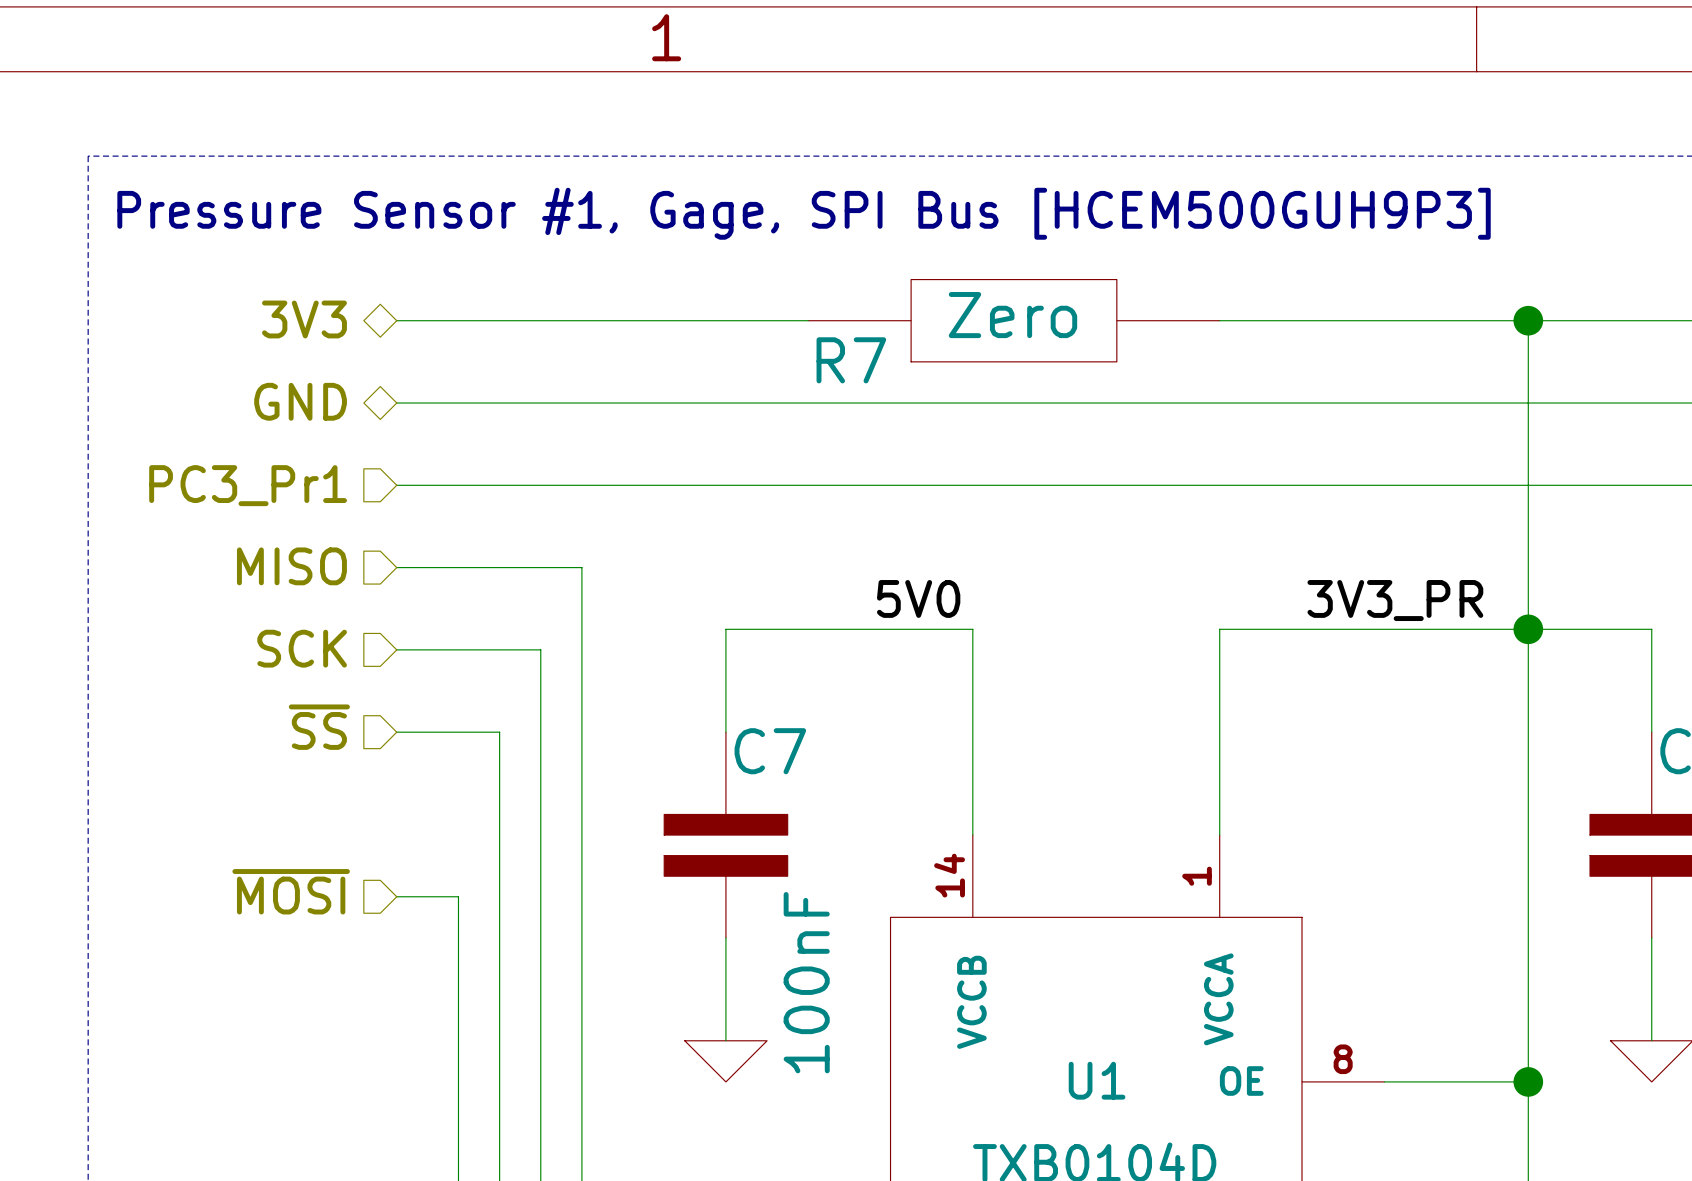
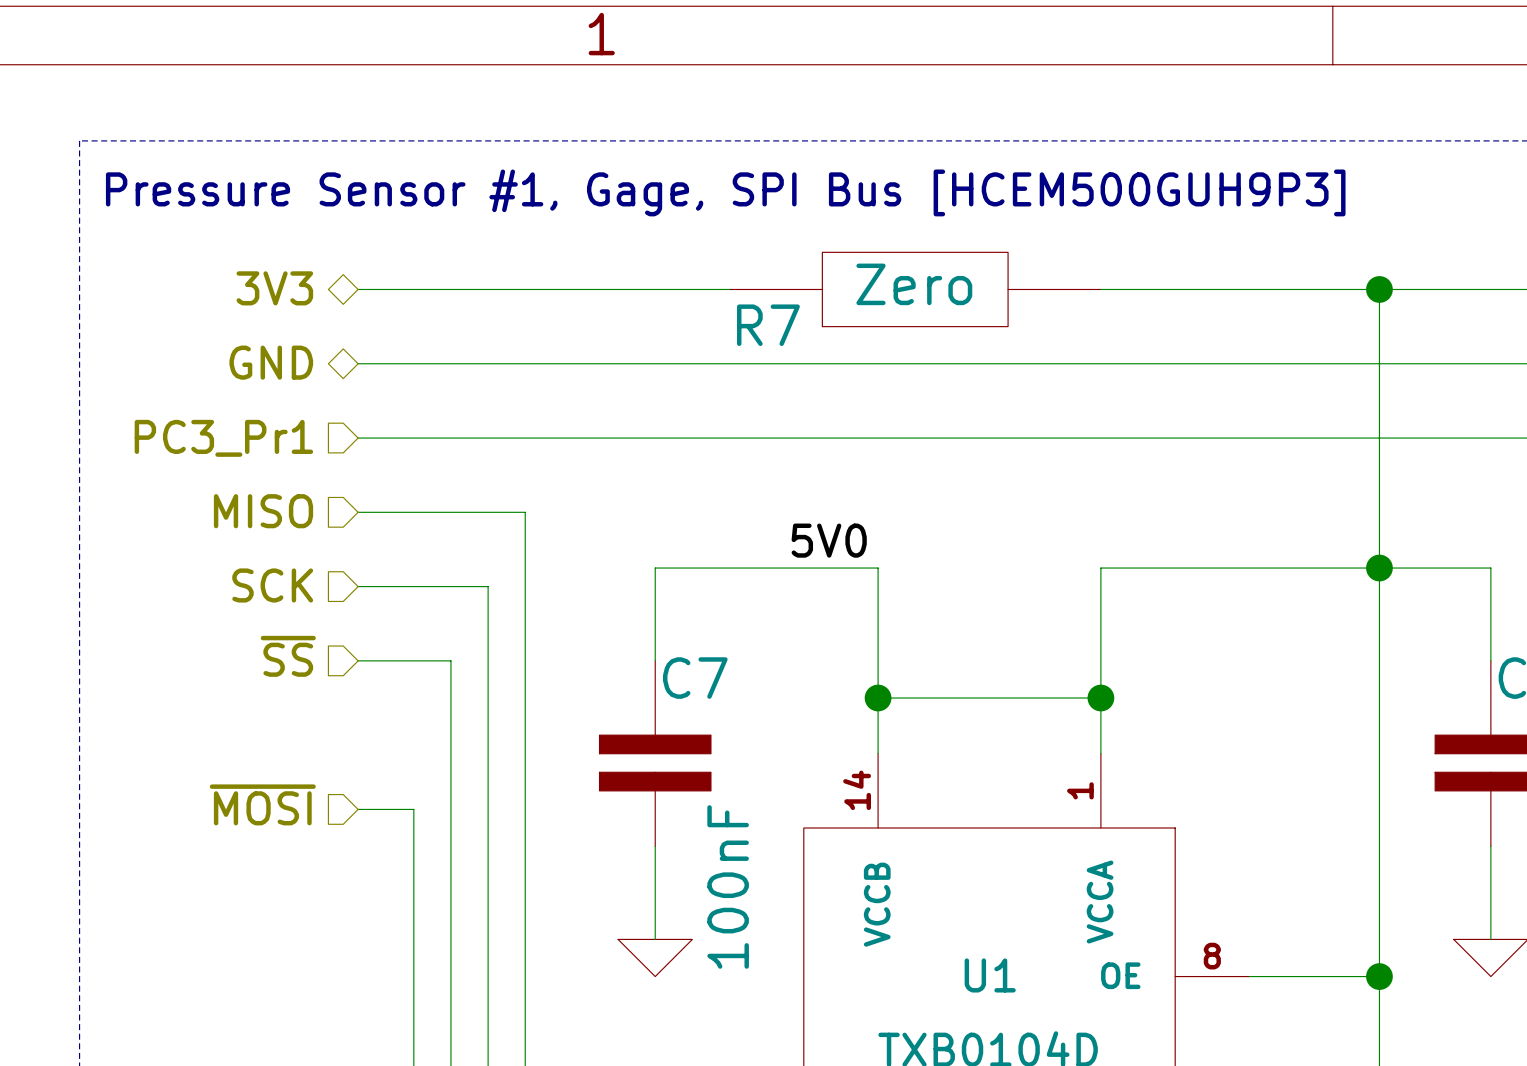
label: 3V3_PR (1395, 600) -> none
wire: none -> (878, 698) (1100, 698)
junction: none -> (878, 698)
junction: none -> (1100, 698)

